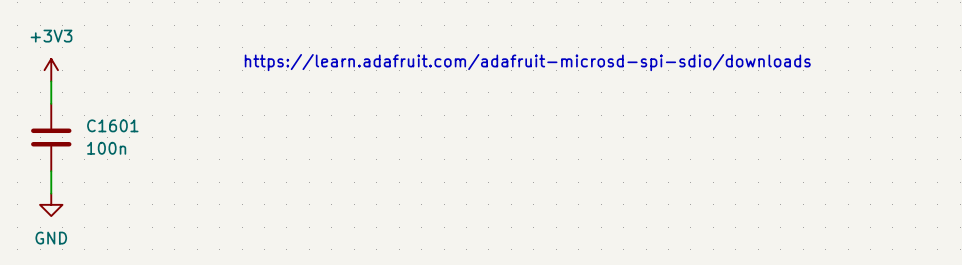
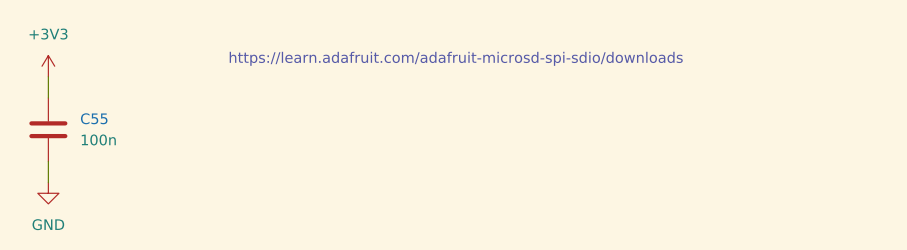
C1601 name: C1601 (112, 125) -> C55 (94, 118)

